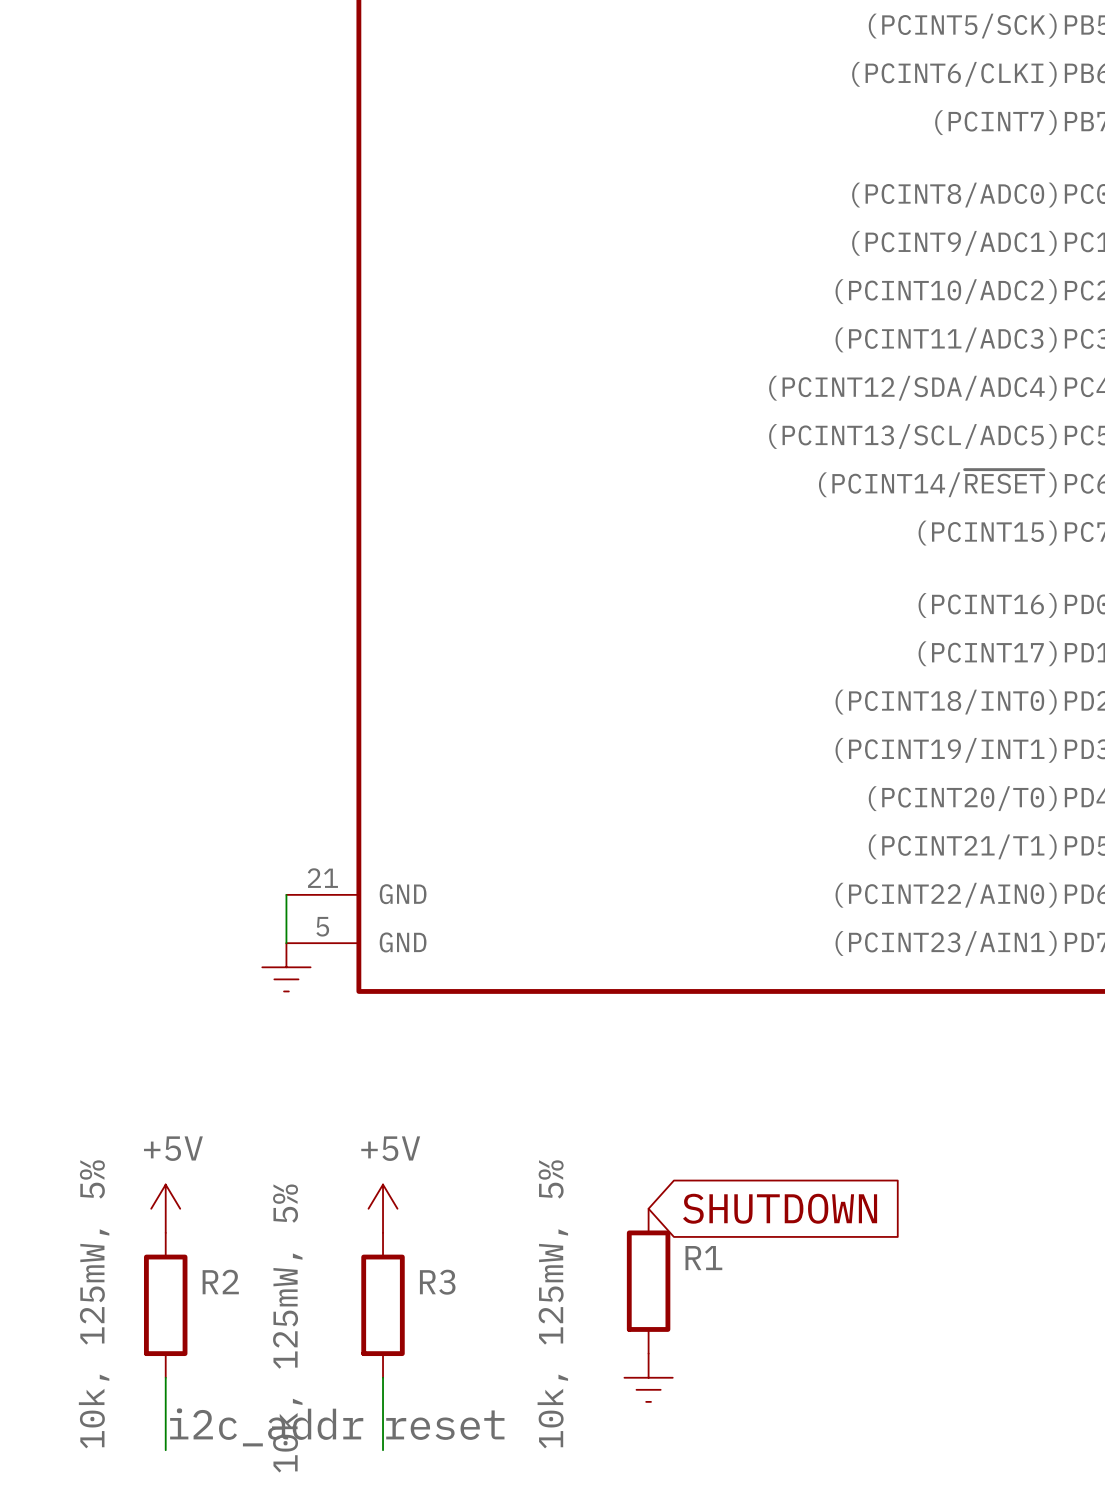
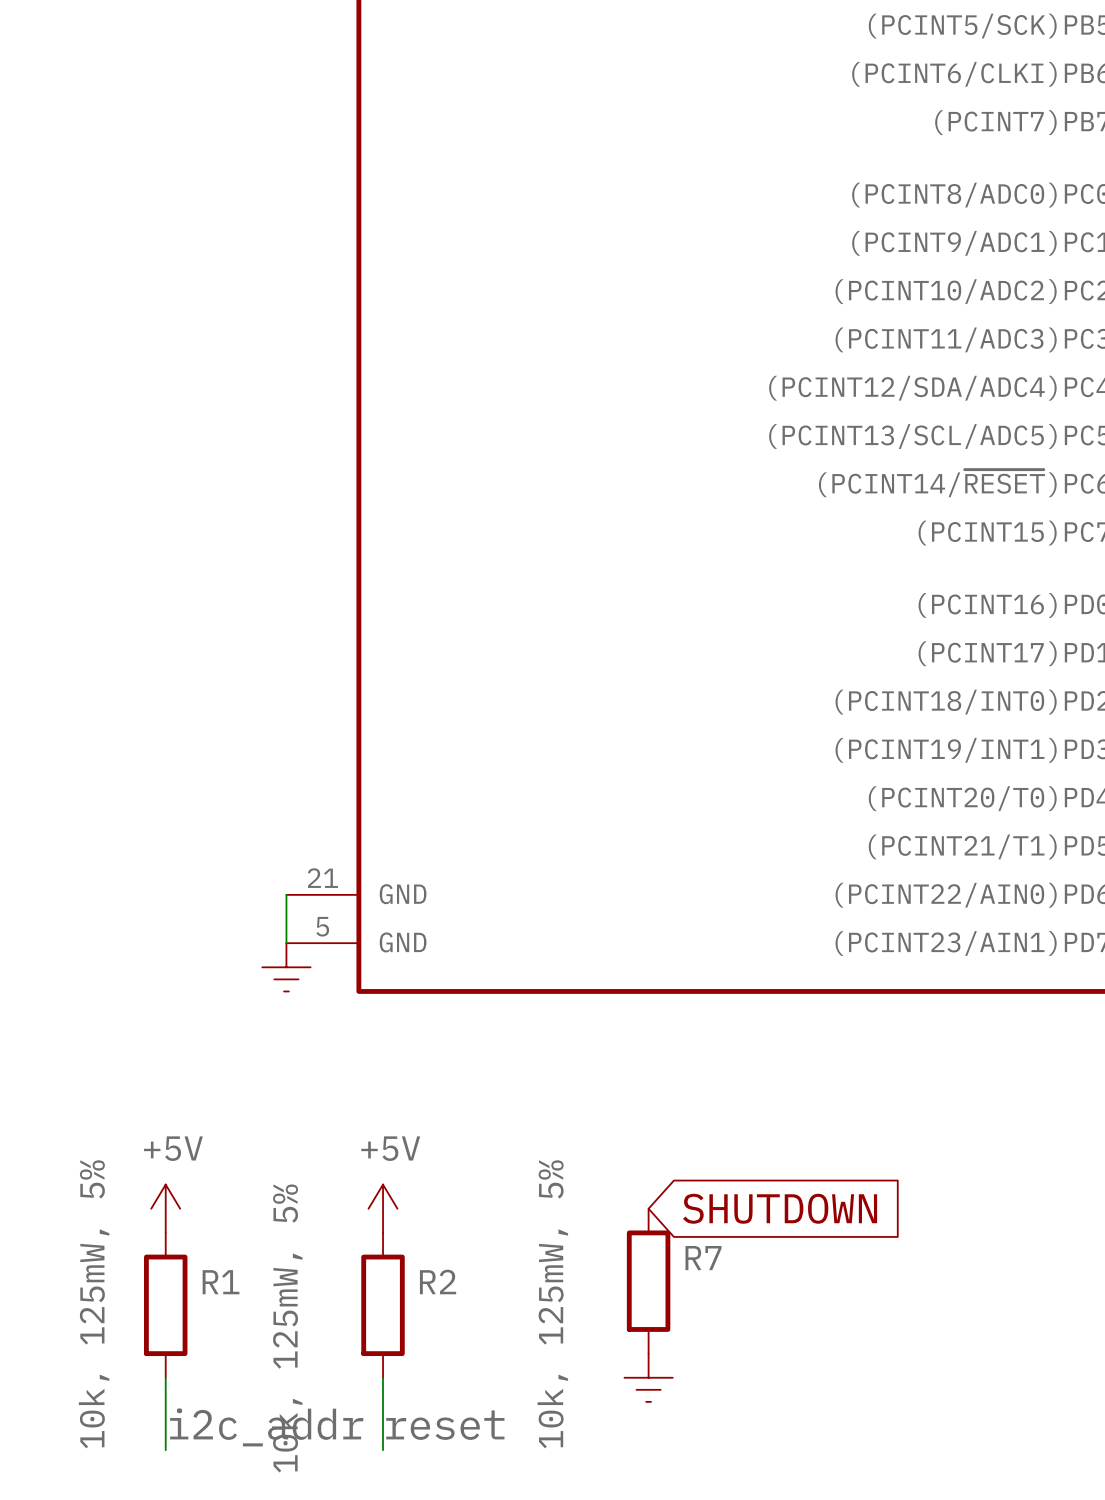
R1 name: R1 (703, 1258) -> R7 (703, 1258)
R2 name: R2 (220, 1282) -> R1 (221, 1282)
R3 name: R3 (437, 1282) -> R2 (438, 1282)

